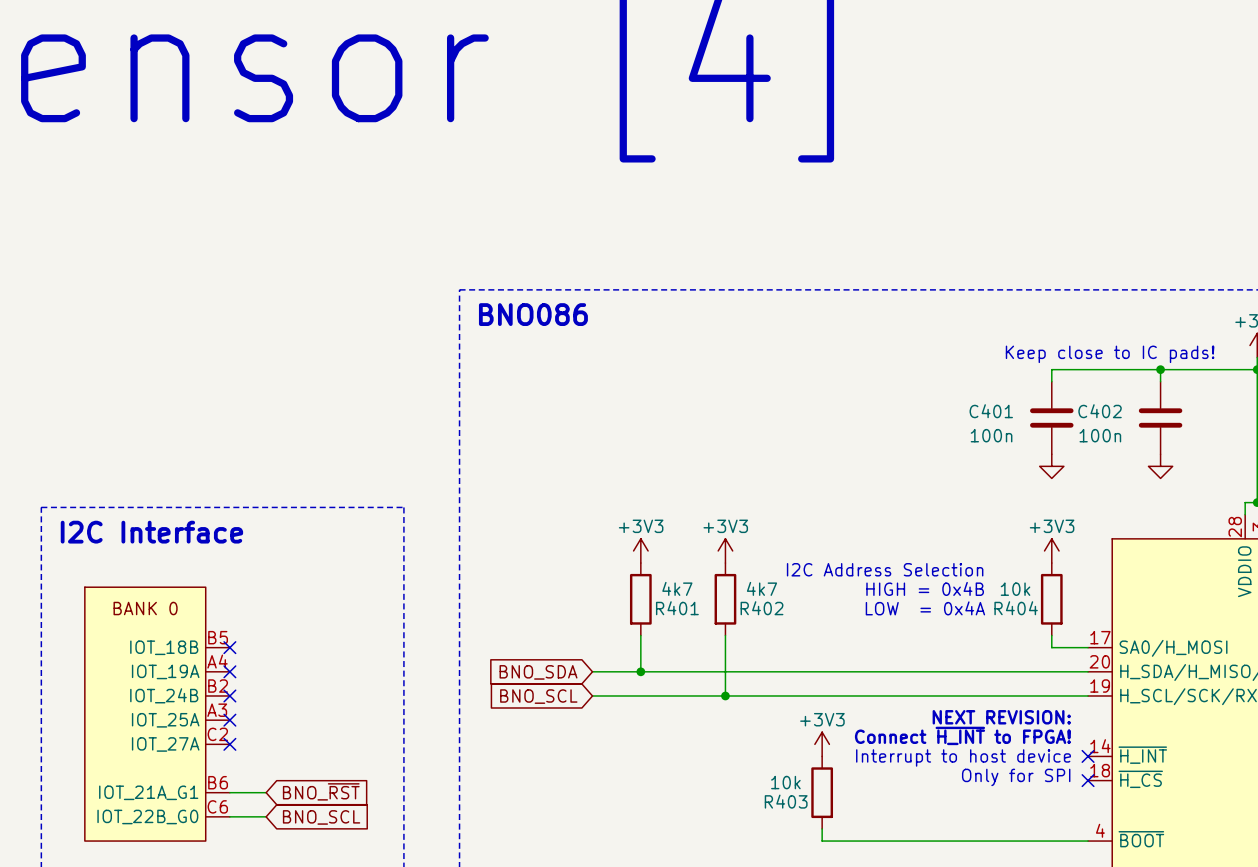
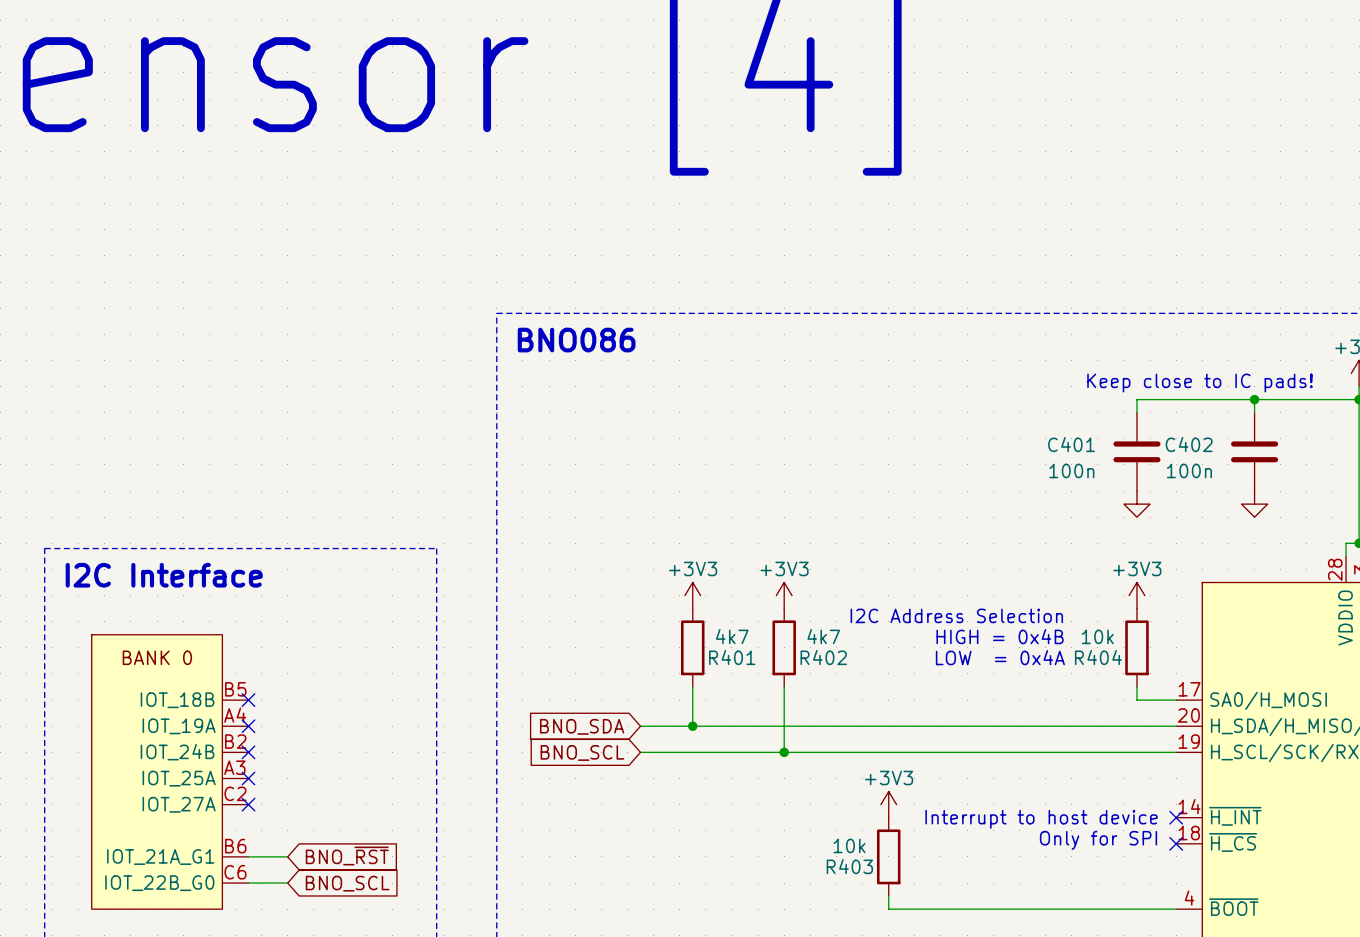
text: NEXT REVISION: (1001, 717) -> none
text: Connect ~{H_INT} to FPGA! (962, 735) -> none

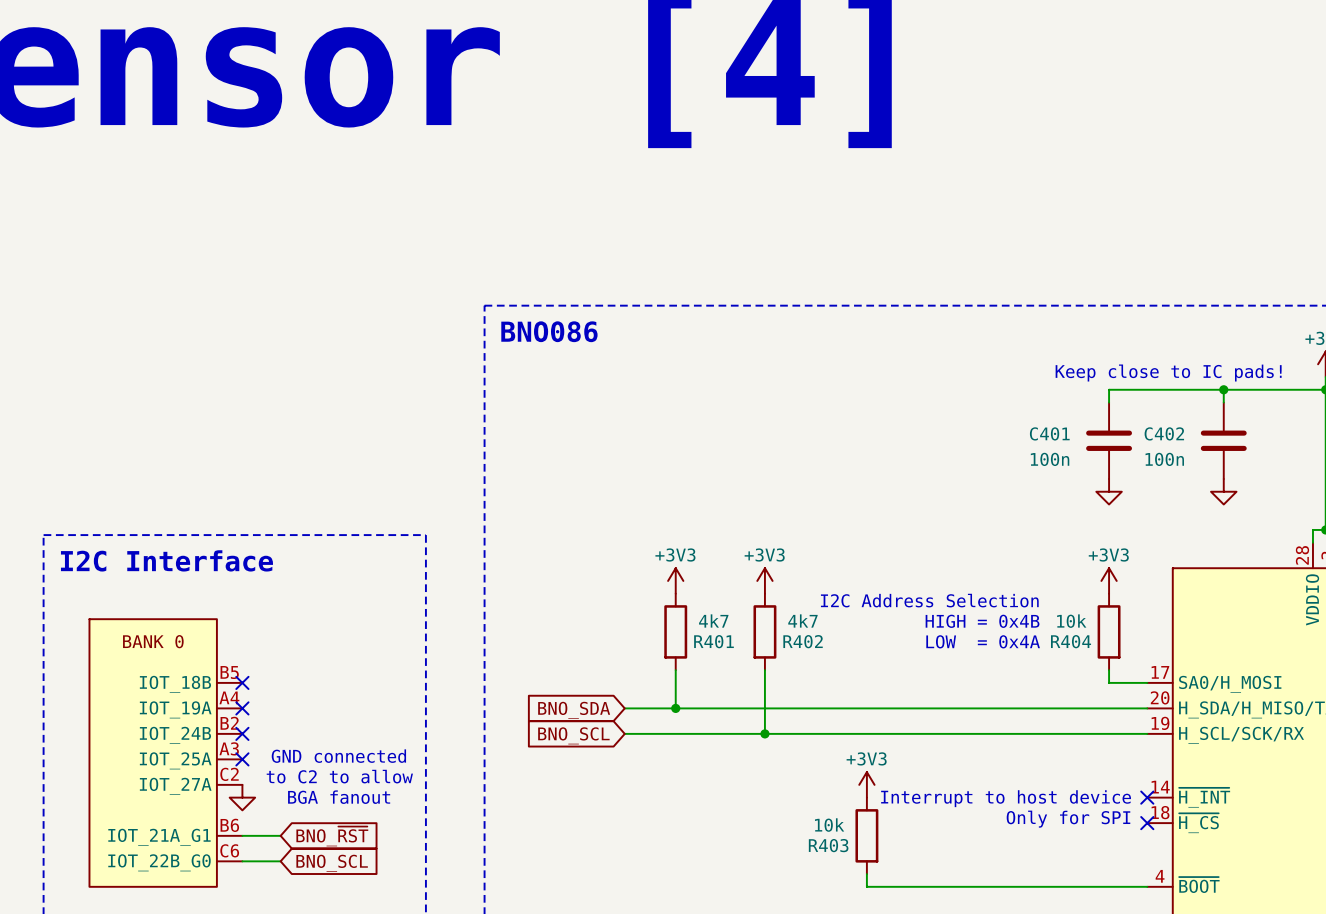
text: none -> GND connected (338, 756)
text: none -> to C2 to allow (339, 776)
no-connect mark: (248, 804) -> none
power symbol: none -> (242, 797)
text: none -> BGA fanout (339, 797)

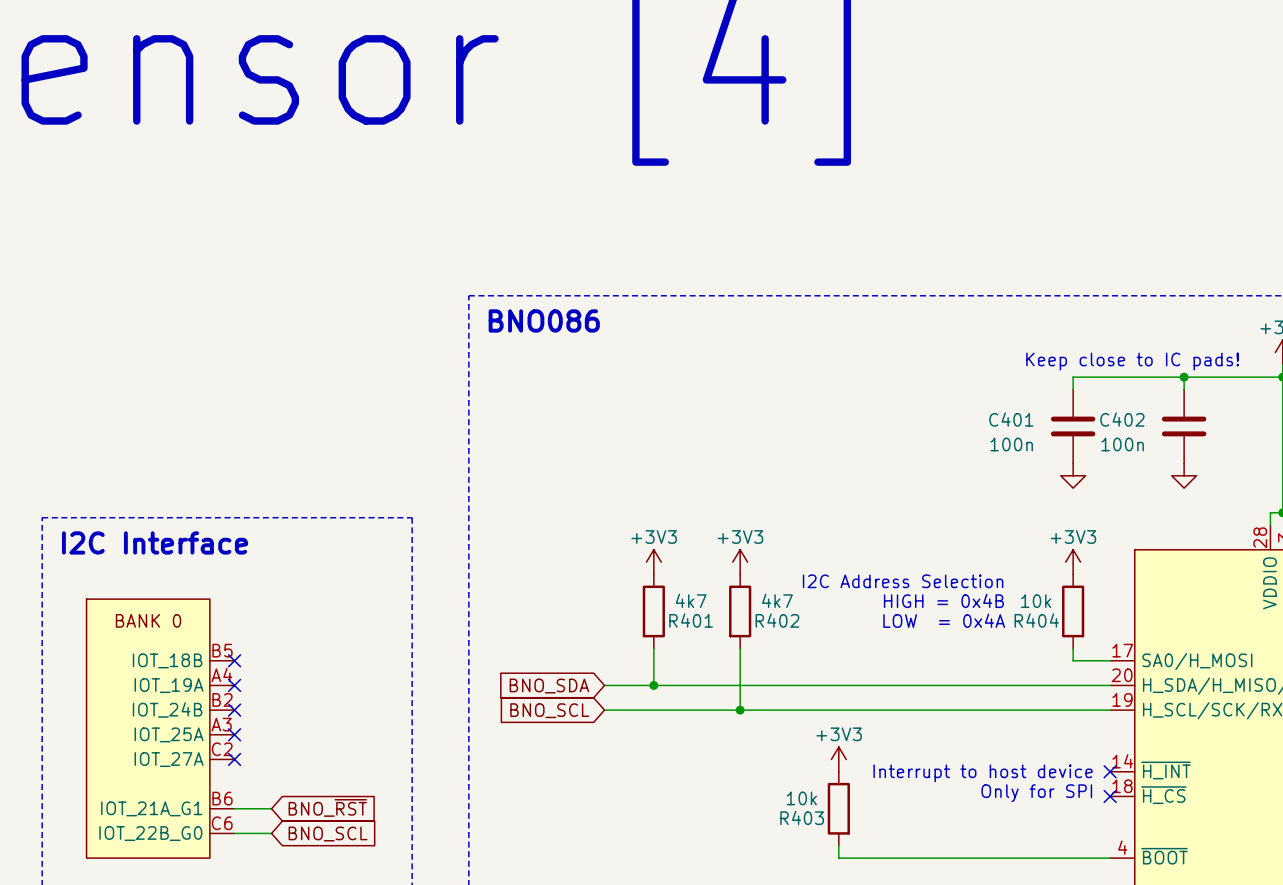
text: GND connected (338, 756) -> none
text: to C2 to allow (339, 776) -> none
no-connect mark: none -> (234, 759)
power symbol: (242, 797) -> none
text: BGA fanout (339, 797) -> none

